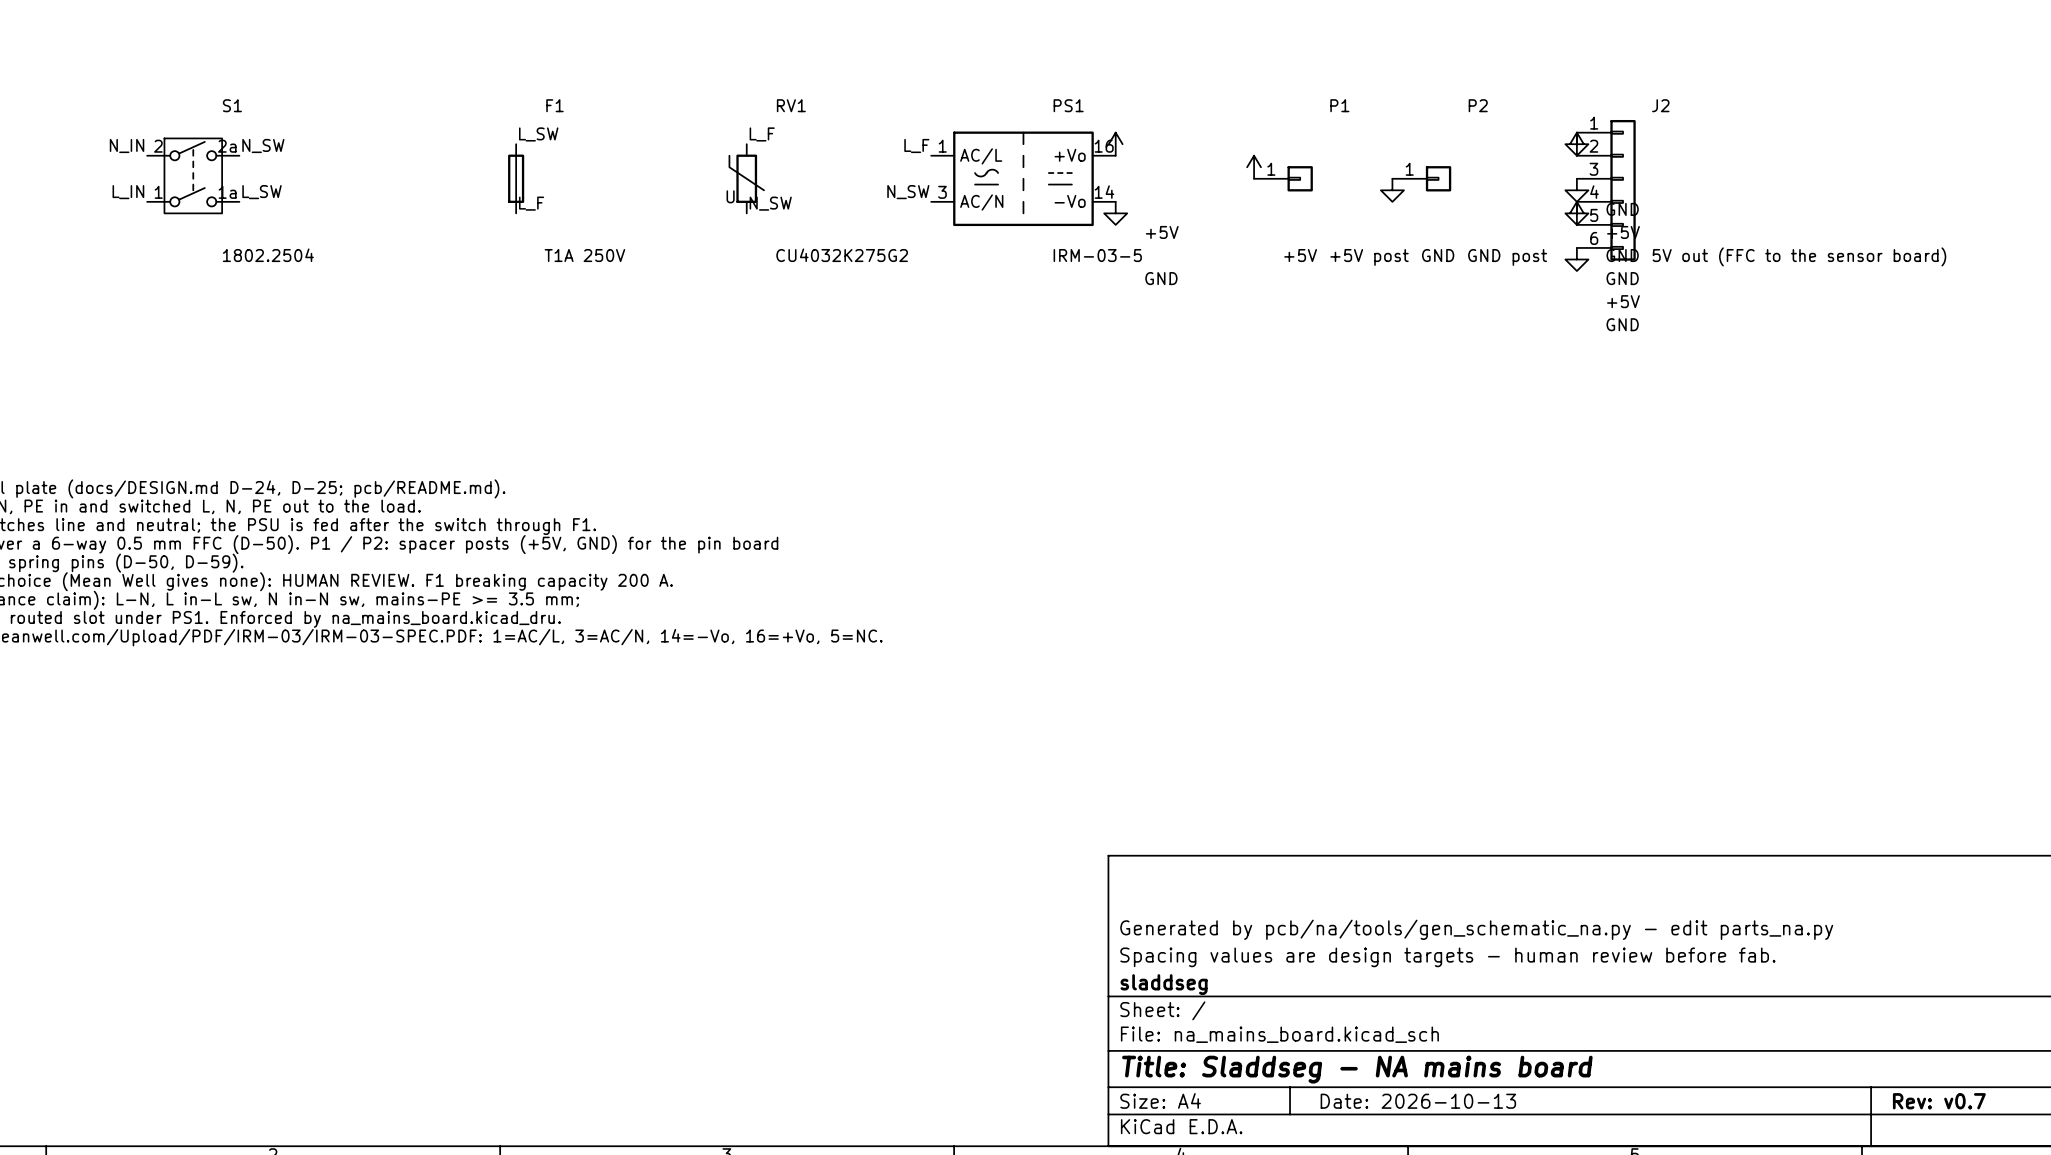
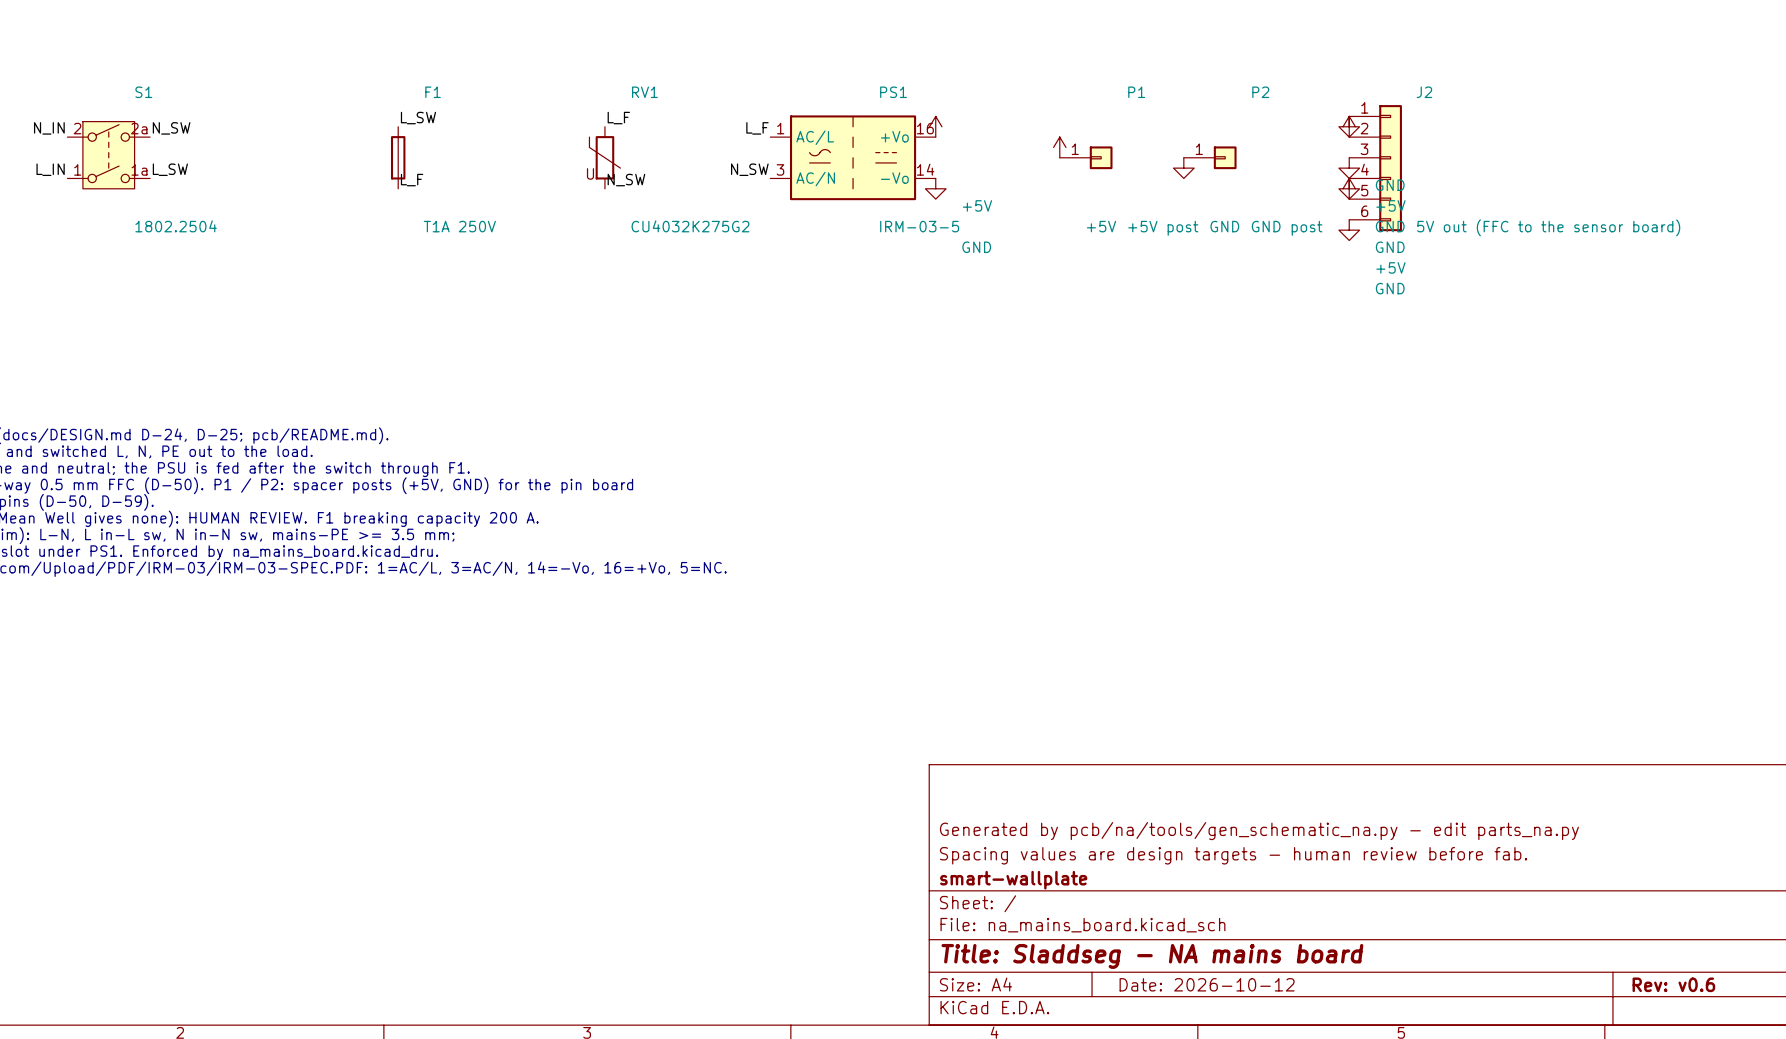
title block: sladdseg (1164, 984) -> smart-wallplate (1013, 880)
title block: Date: 2026-10-13 (1418, 1101) -> Date: 2026-10-12 (1207, 984)
title block: Rev: v0.7 (1939, 1101) -> Rev: v0.6 (1673, 984)

